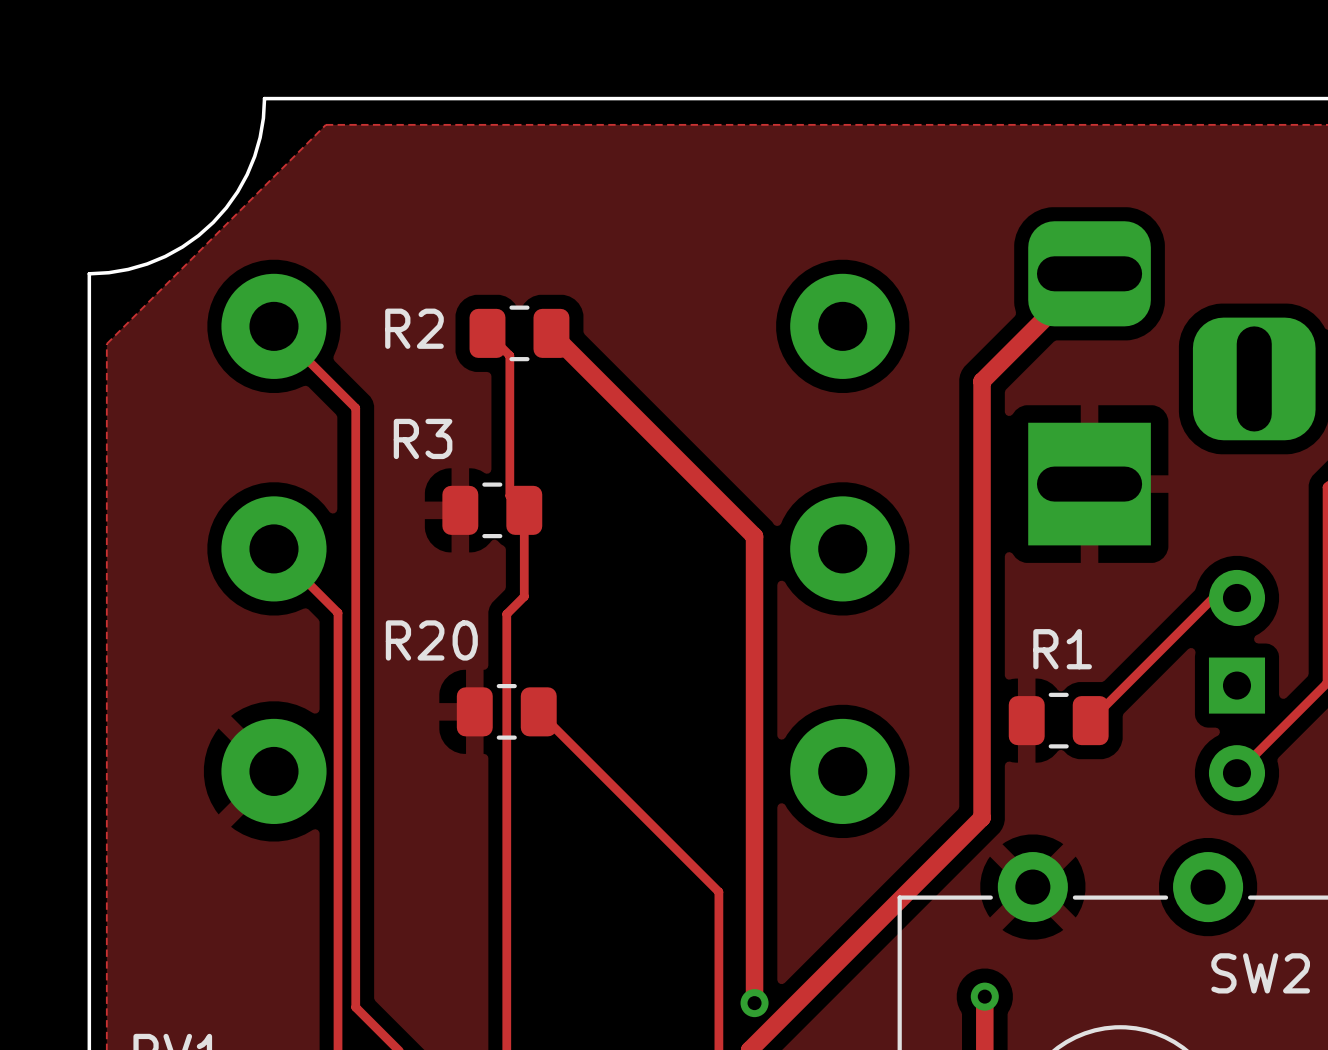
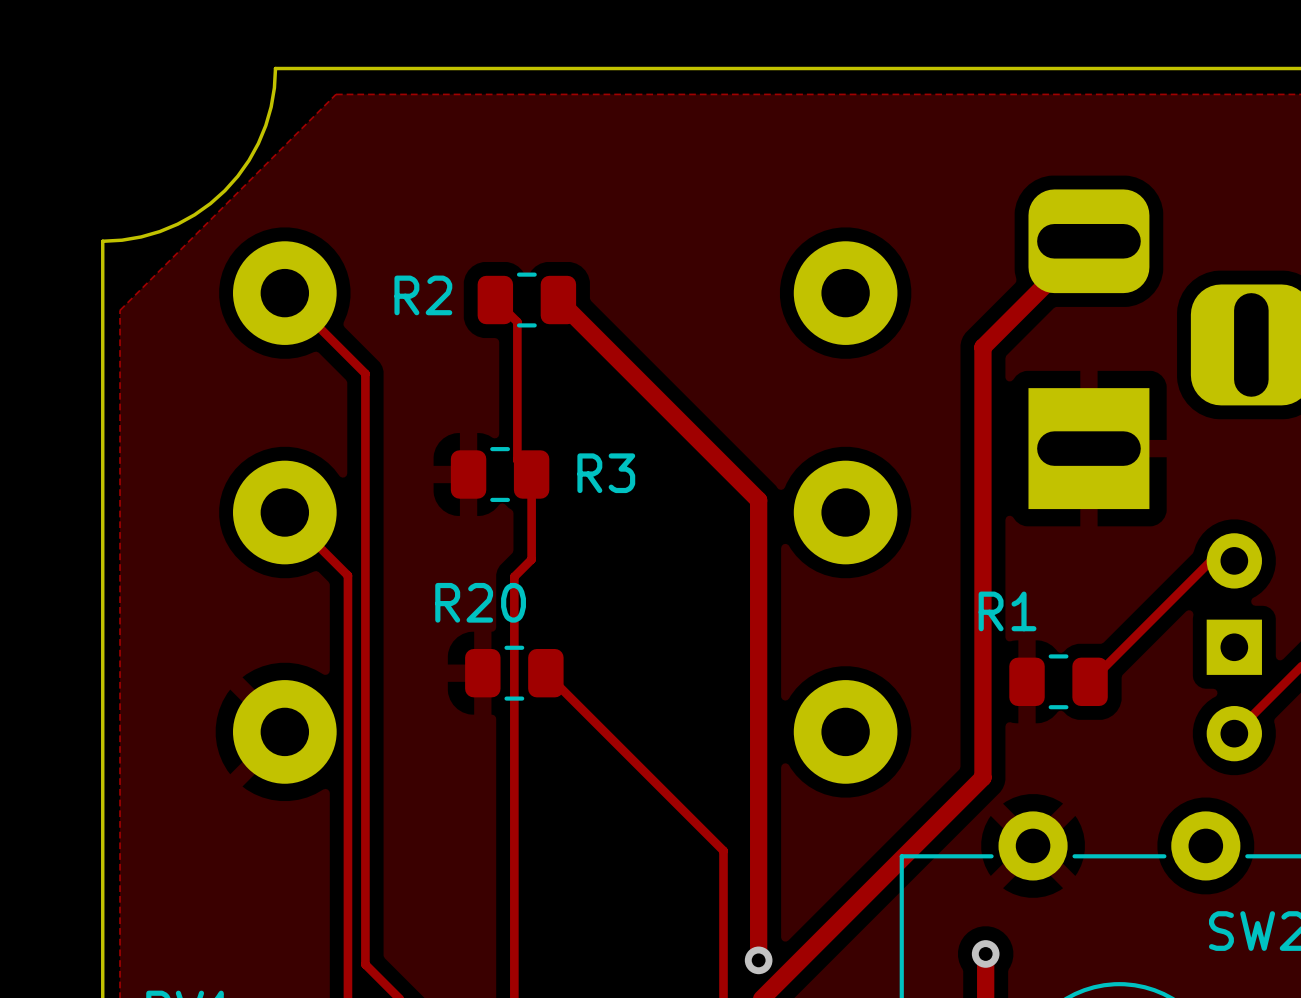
R3 name position: R3 (423, 438) -> R3 (606, 473)
R20 name position: R20 (431, 640) -> R20 (480, 602)
R1 name position: R1 (1062, 649) -> R1 (1007, 611)

